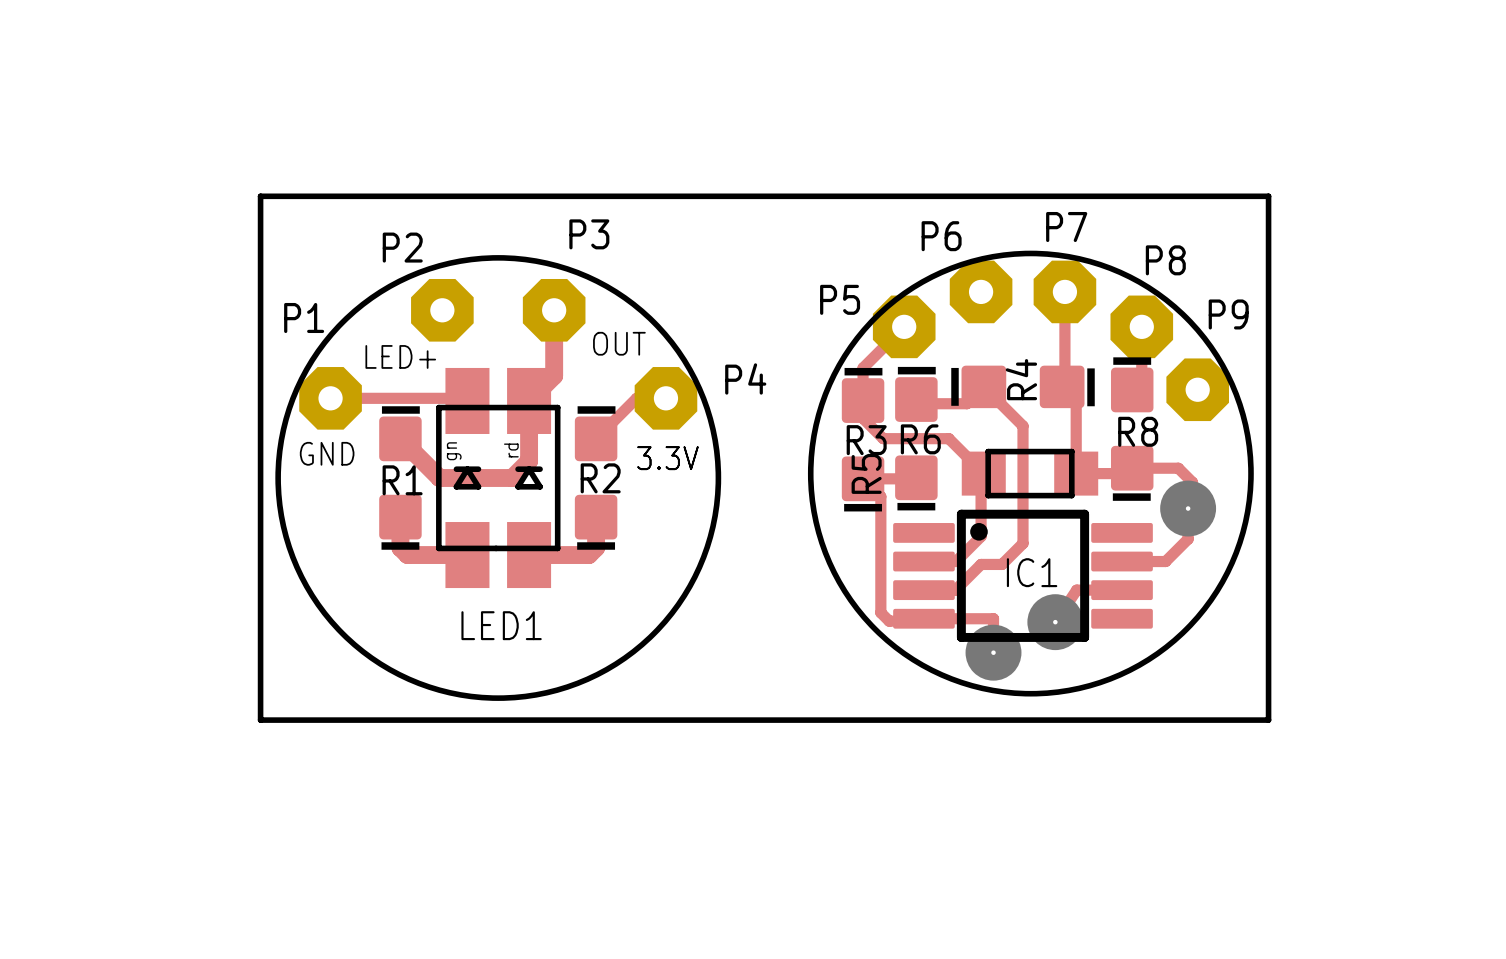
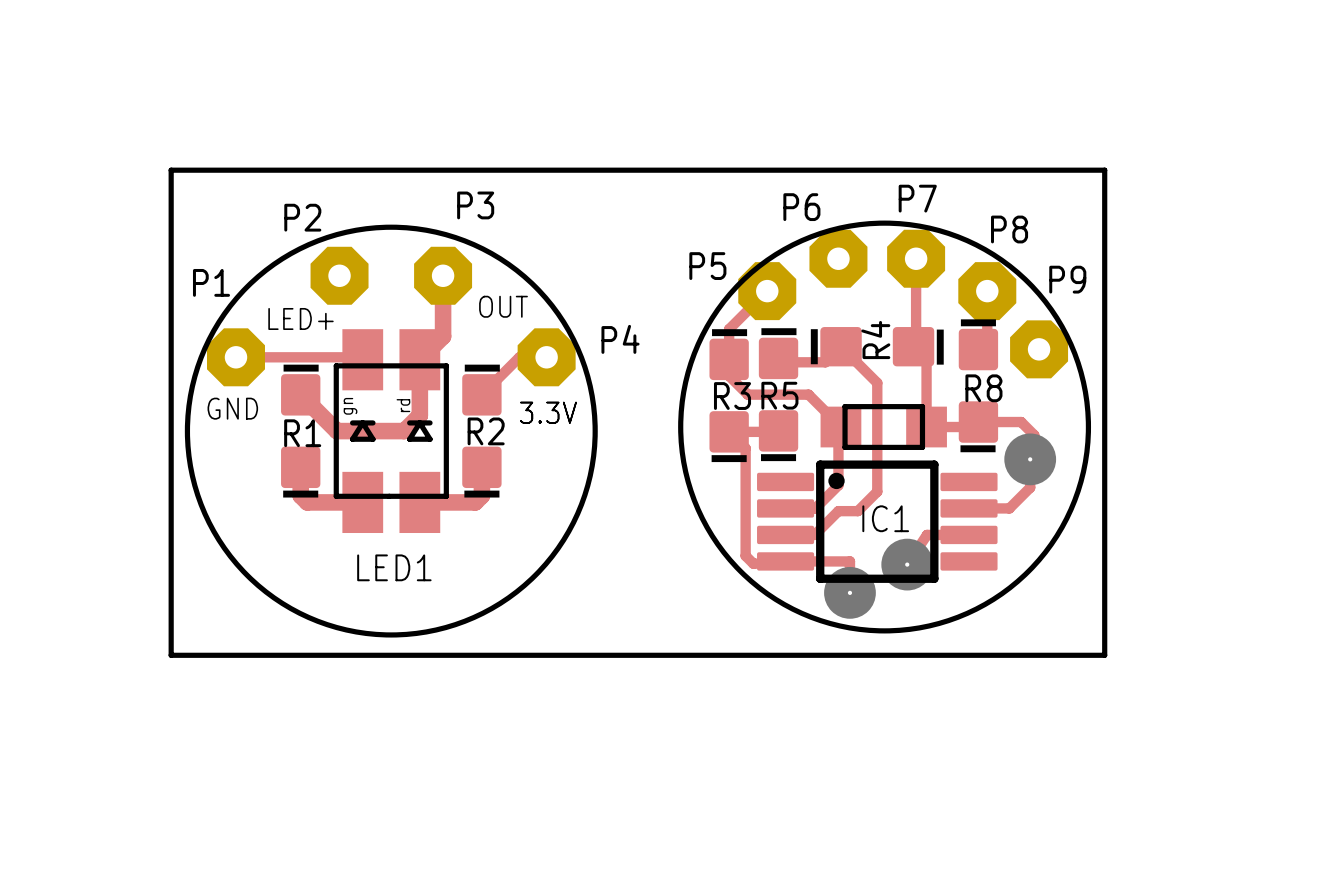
R6: (920, 439) -> none
R5 name rotation: 0° (866, 473) -> 90° clockwise (779, 395)

